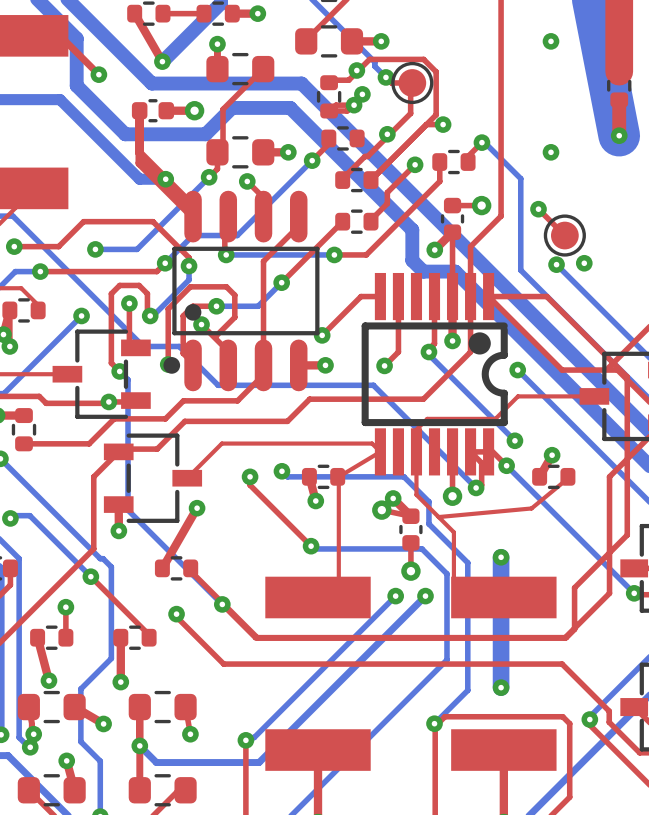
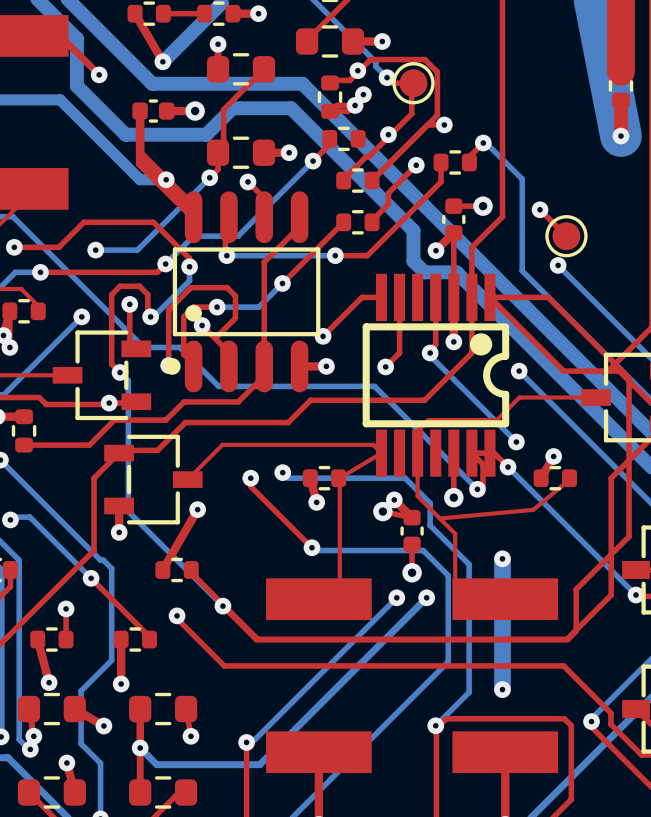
via: (551, 41) -> none
via: (551, 152) -> none
via: (584, 263) -> none

